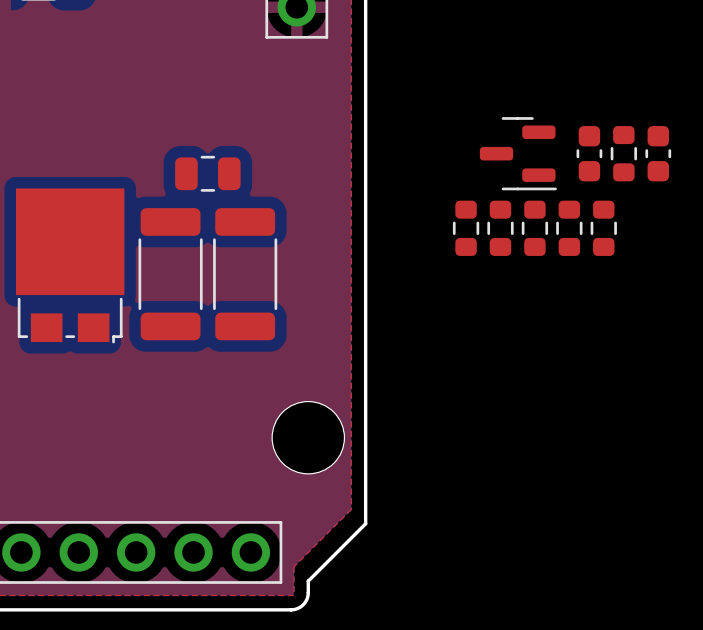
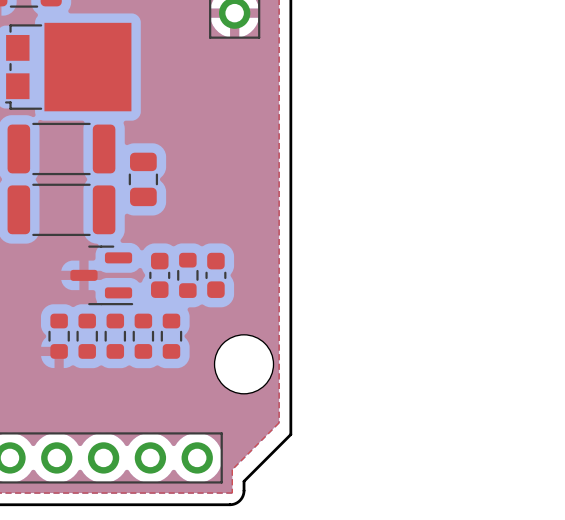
part position: (518, 153) -> (101, 275)
part: (589, 153) -> none
part: (623, 153) -> none
part: (658, 153) -> none
part: none -> (61, 148)
part rotation: 0° (207, 173) -> 90° clockwise (143, 179)
part position: (207, 173) -> (143, 179)
part: (466, 228) -> none
part: (500, 228) -> none
part: (534, 228) -> none
part: (569, 228) -> none
part: (603, 228) -> none
part: none -> (61, 209)
part rotation: 0° (70, 265) -> 90° clockwise (68, 67)
part position: (70, 265) -> (68, 67)
part: (170, 274) -> none
part: (245, 274) -> none
part: none -> (159, 275)
part: none -> (187, 275)
part: none -> (215, 275)
part: none -> (59, 336)
part: none -> (87, 336)
part: none -> (115, 336)
part: none -> (143, 336)
part: none -> (171, 336)

